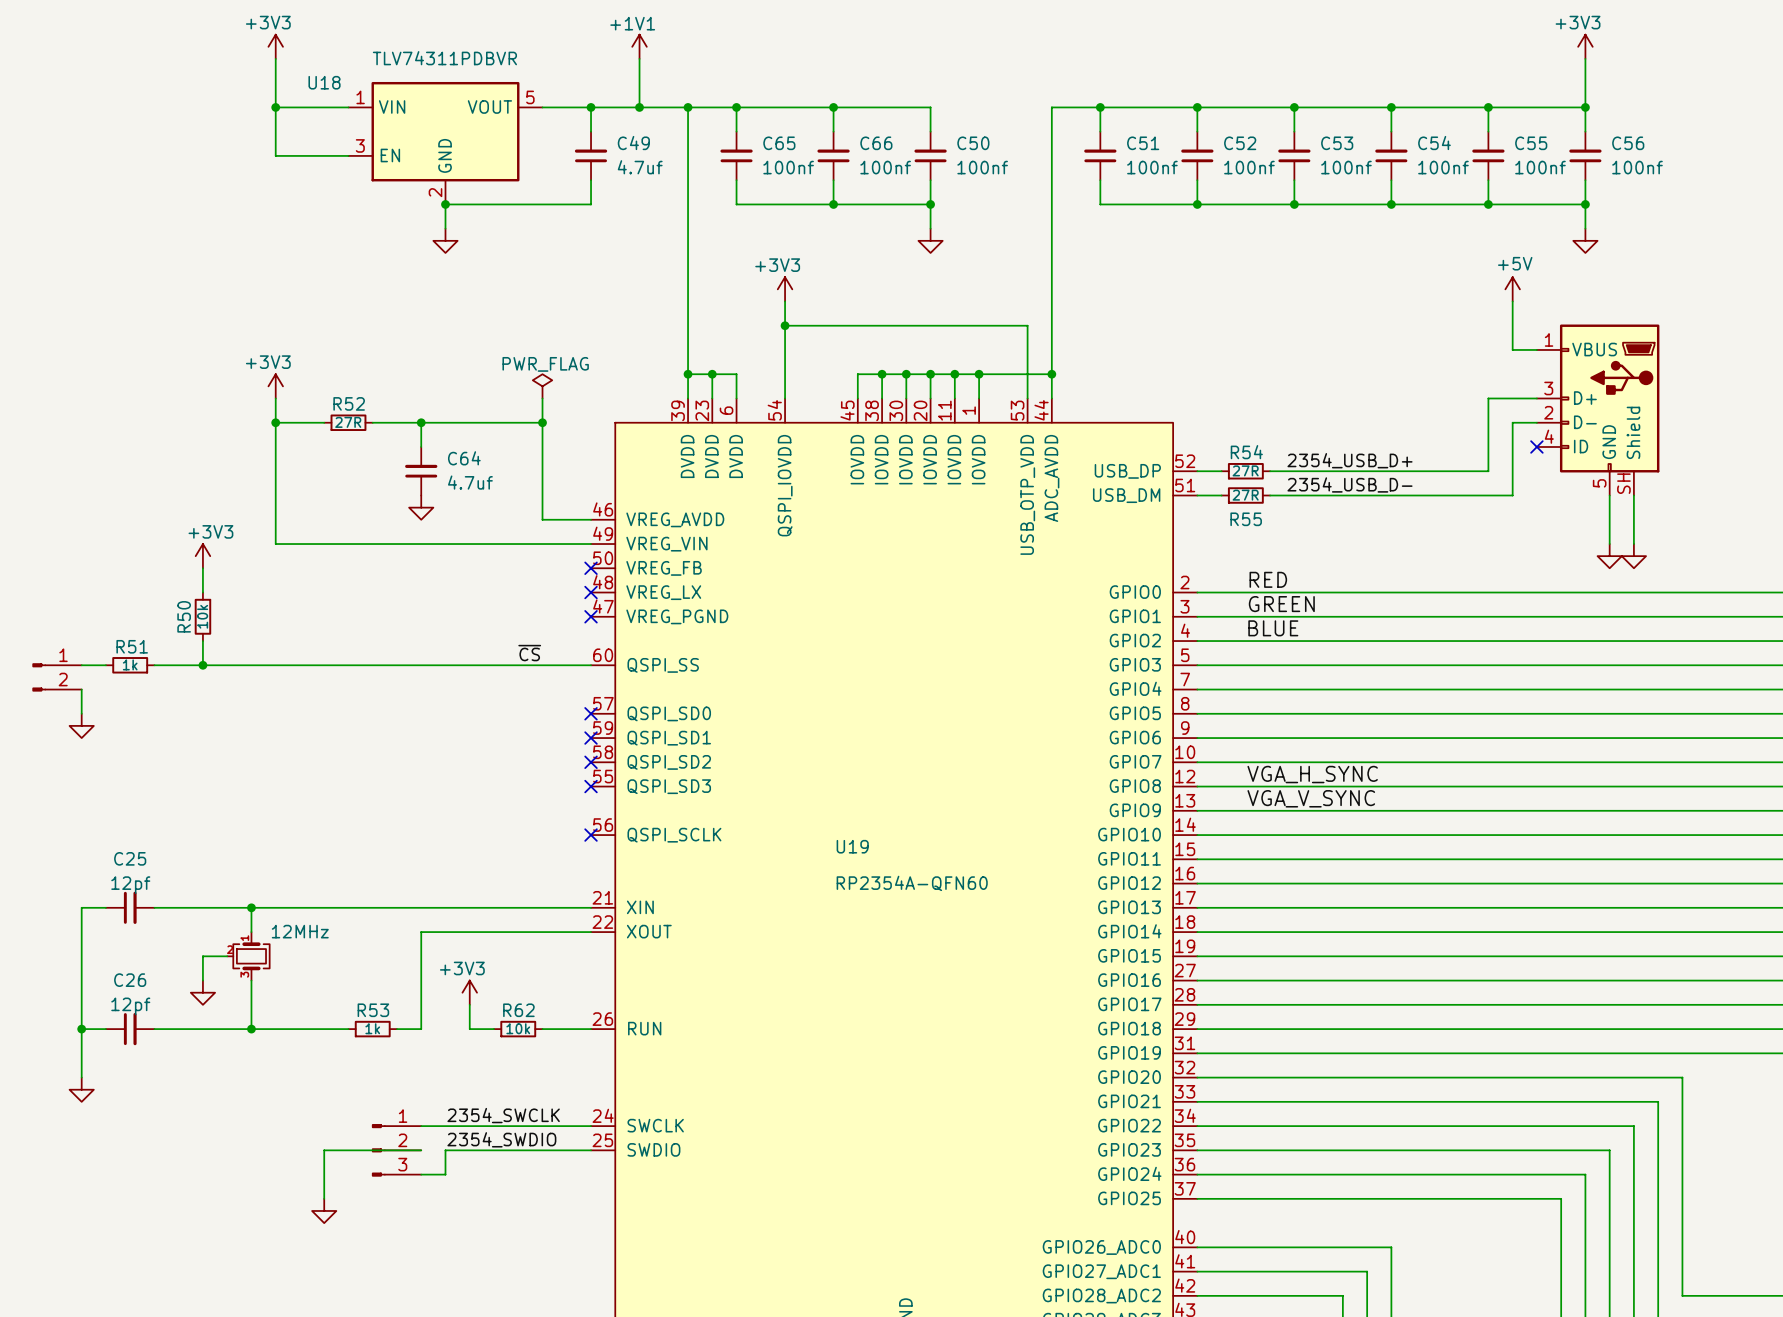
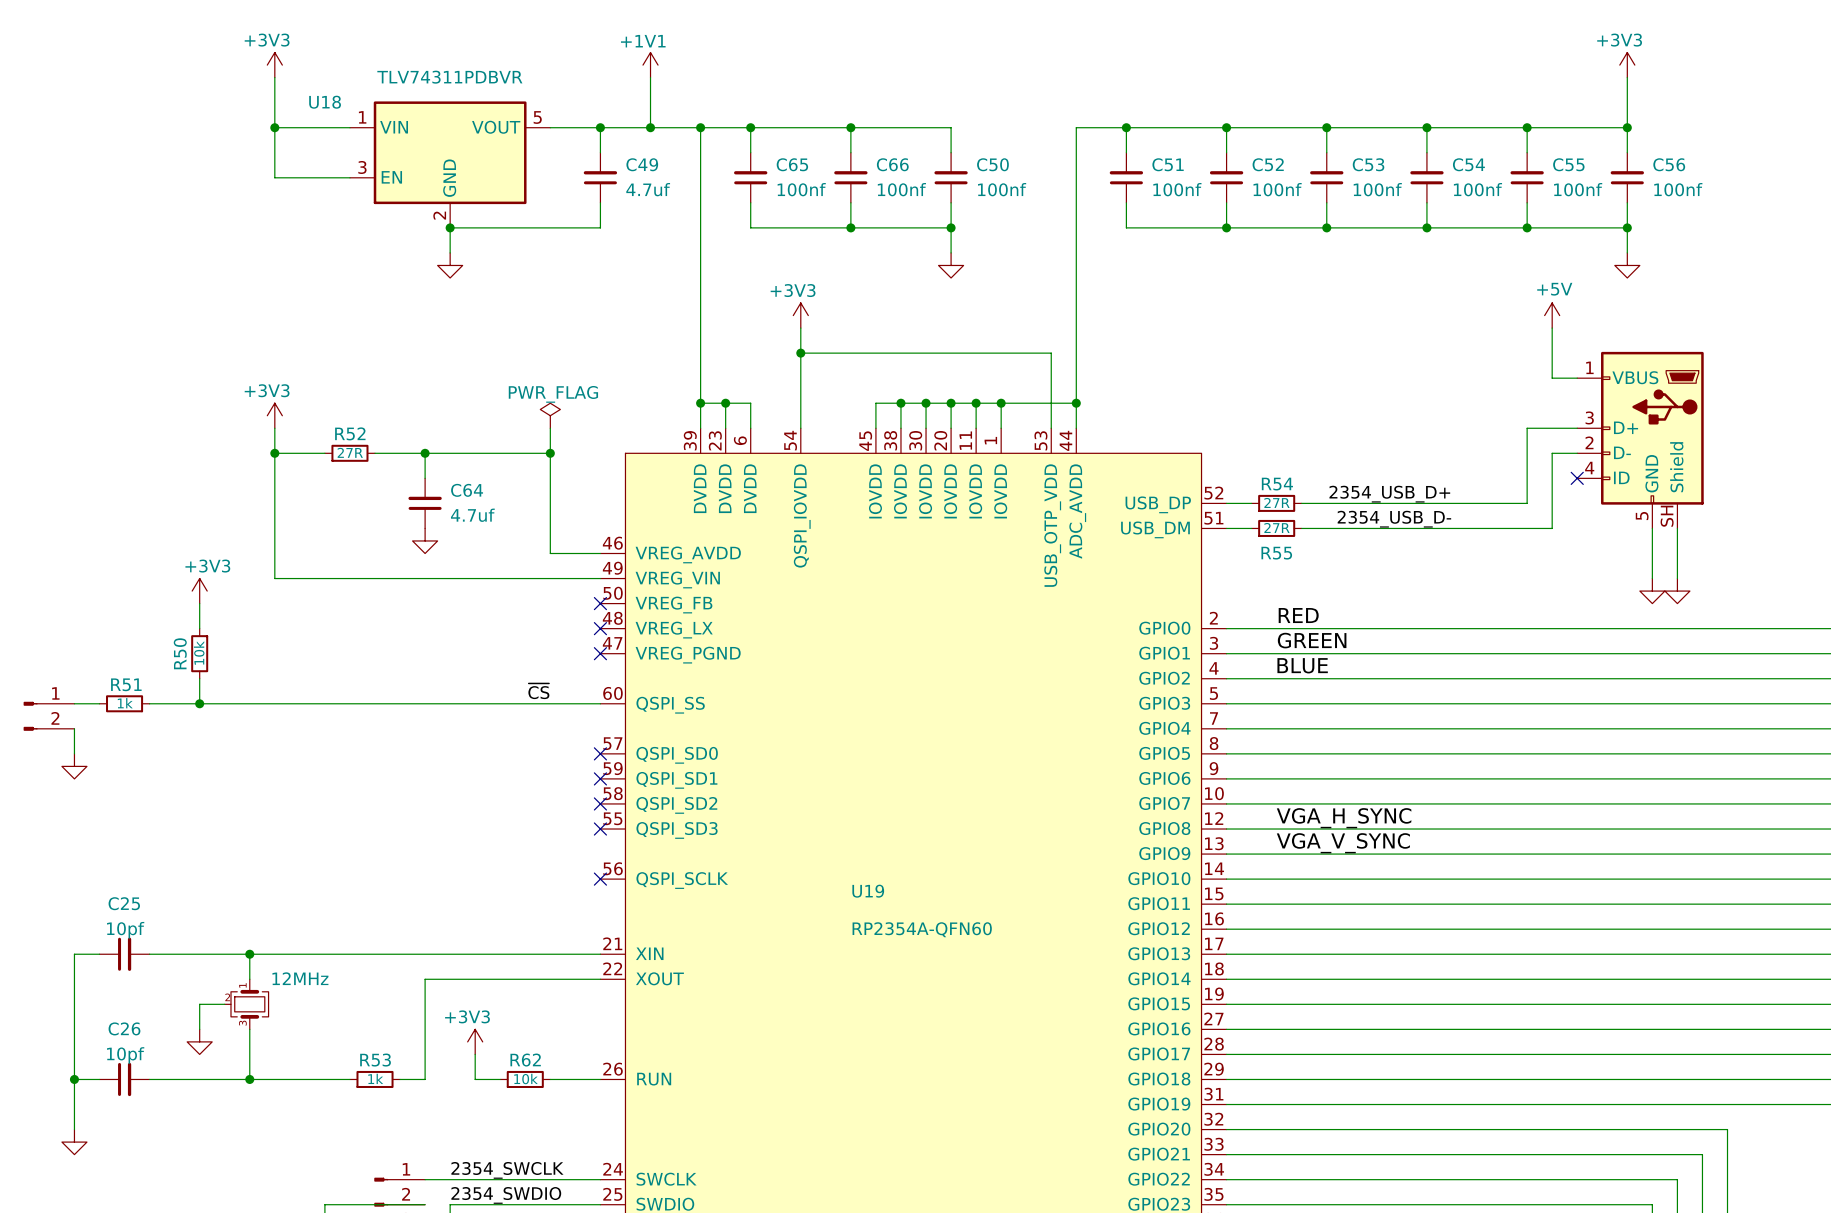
C25 value: 12pf (130, 885) -> 10pf (125, 930)
C26 value: 12pf (130, 1006) -> 10pf (125, 1055)

